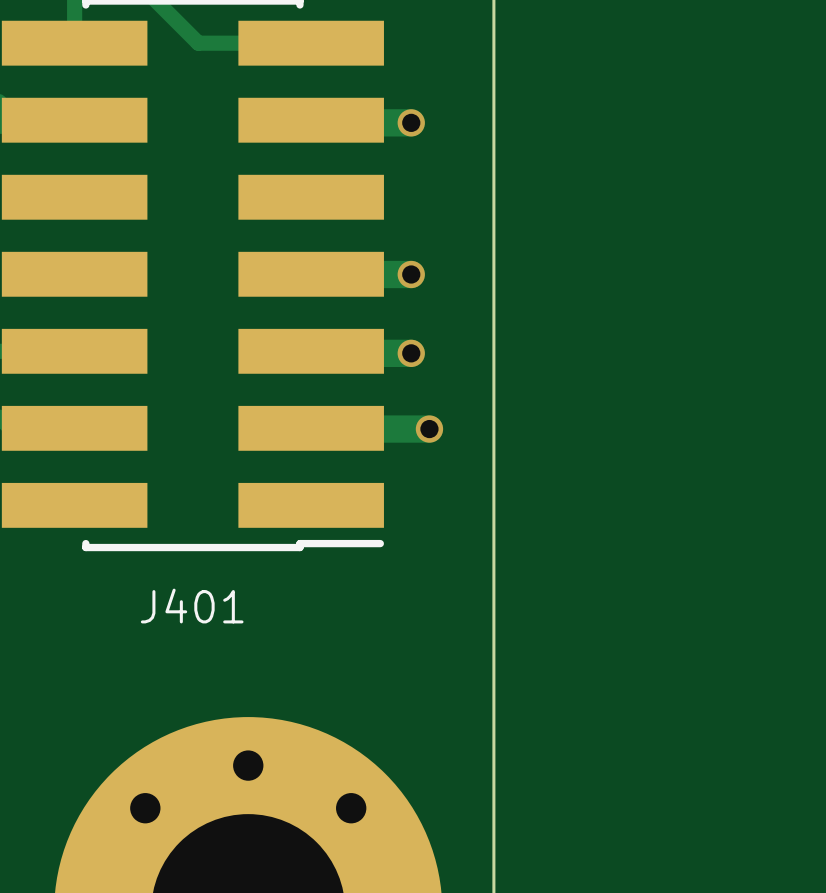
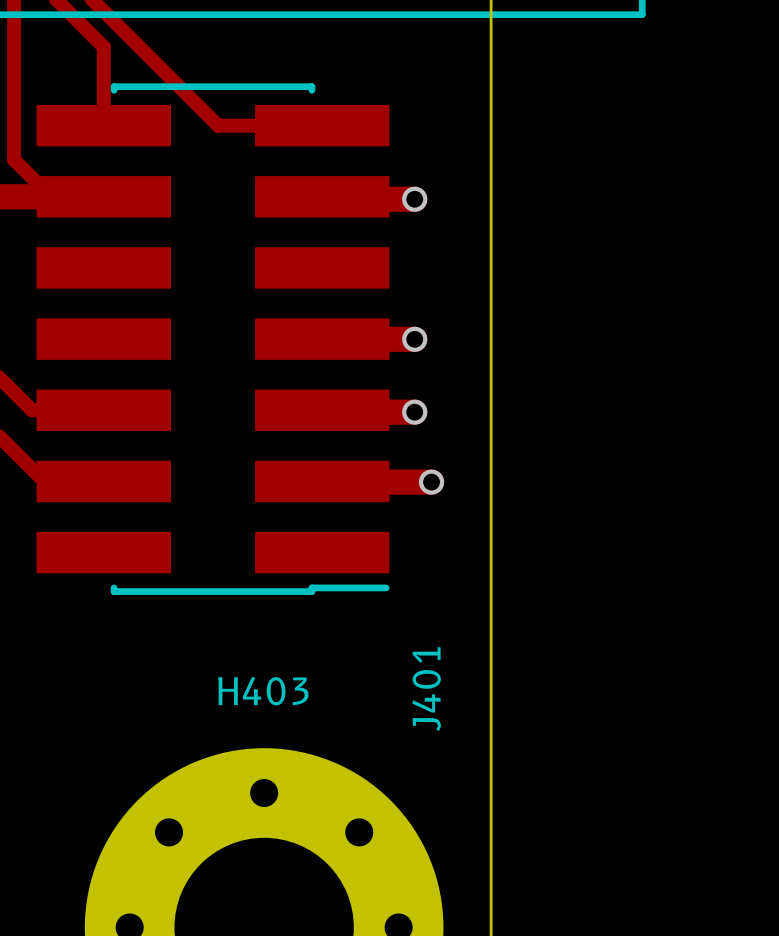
J401 name rotation: 0° (192, 606) -> 90° counterclockwise (426, 689)
J401 name position: J401 (192, 606) -> J401 (426, 689)
H403 name: none -> H403 (263, 691)

